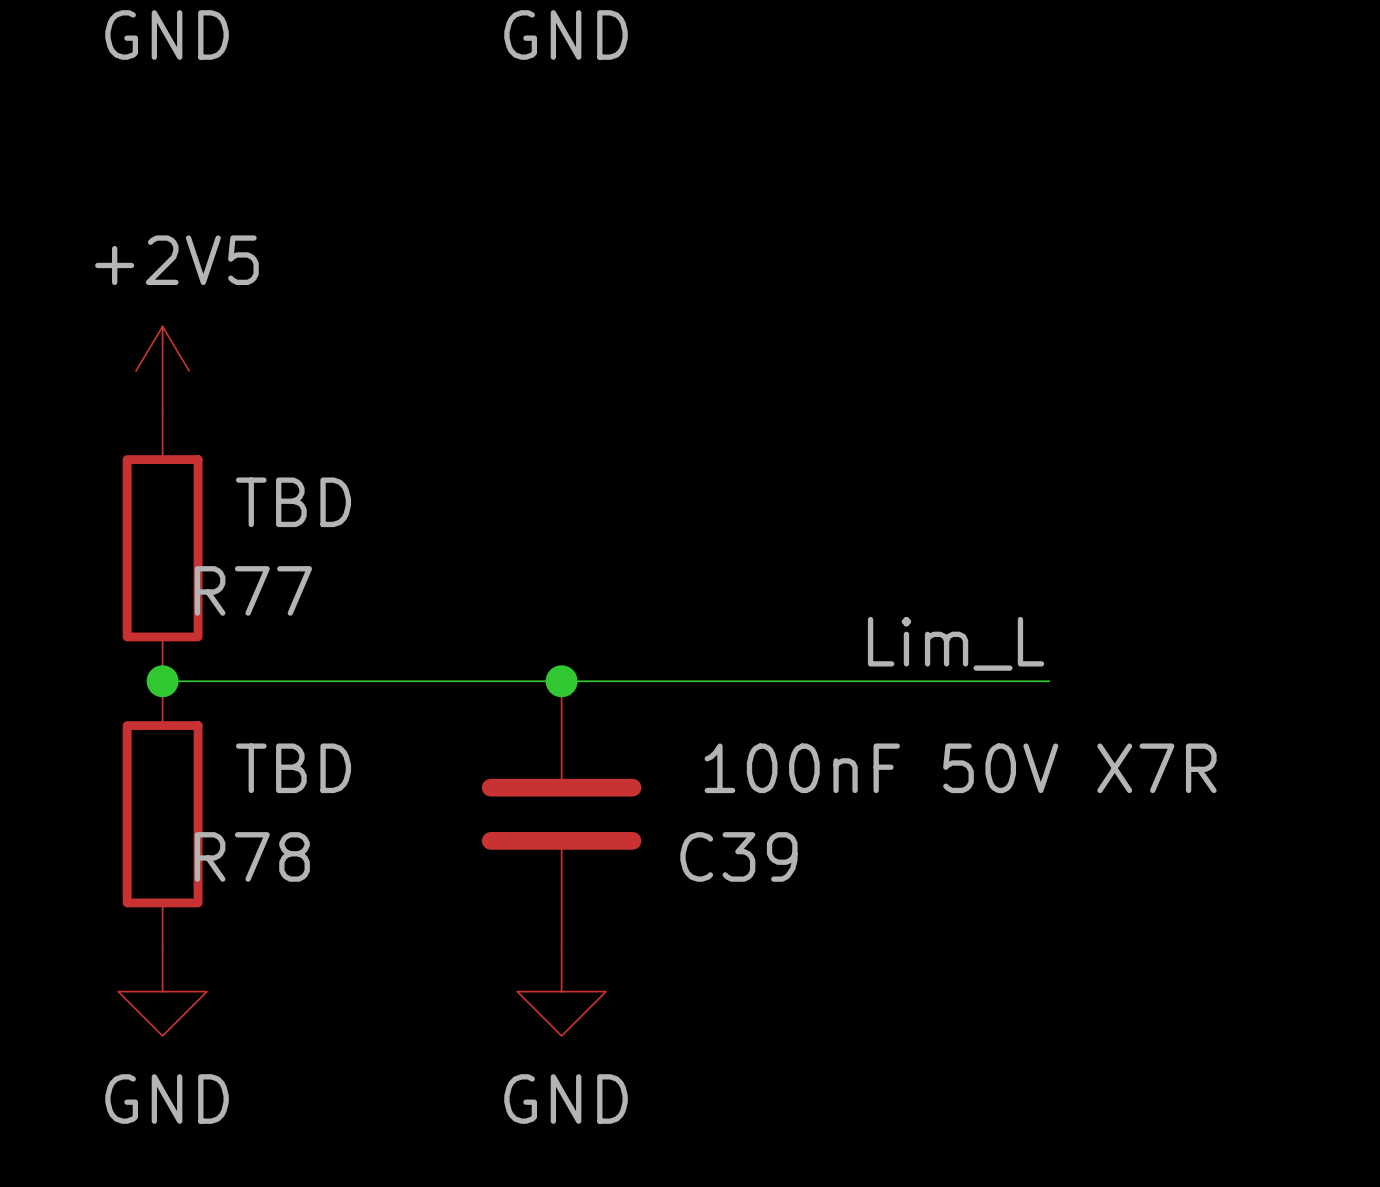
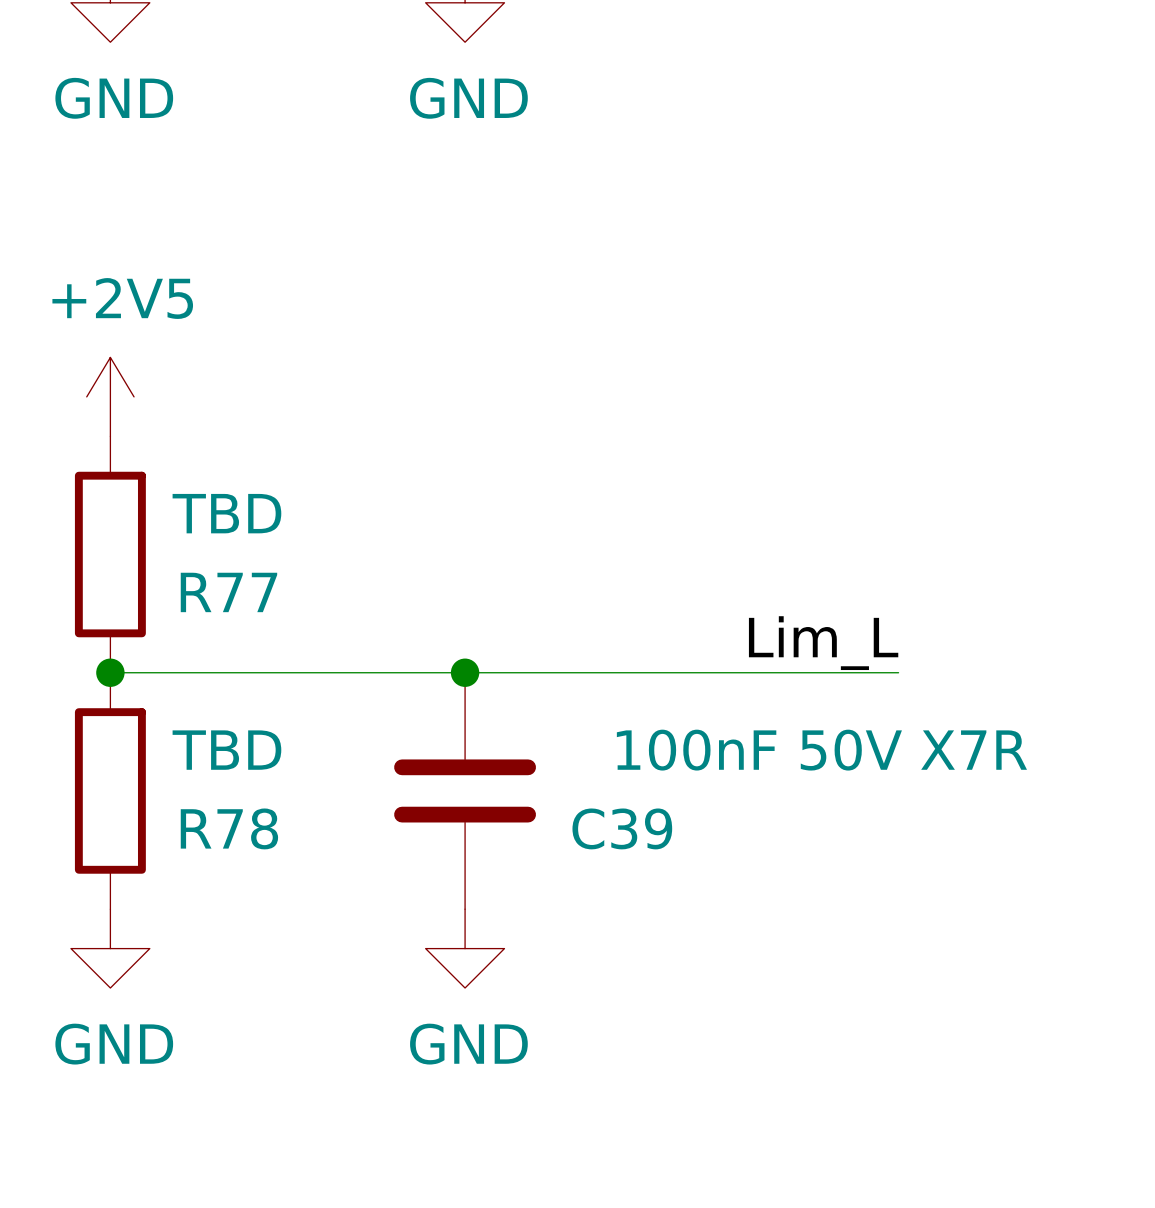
R77 name position: R77 (253, 590) -> R77 (228, 592)
R78 name position: R78 (252, 856) -> R78 (229, 828)

